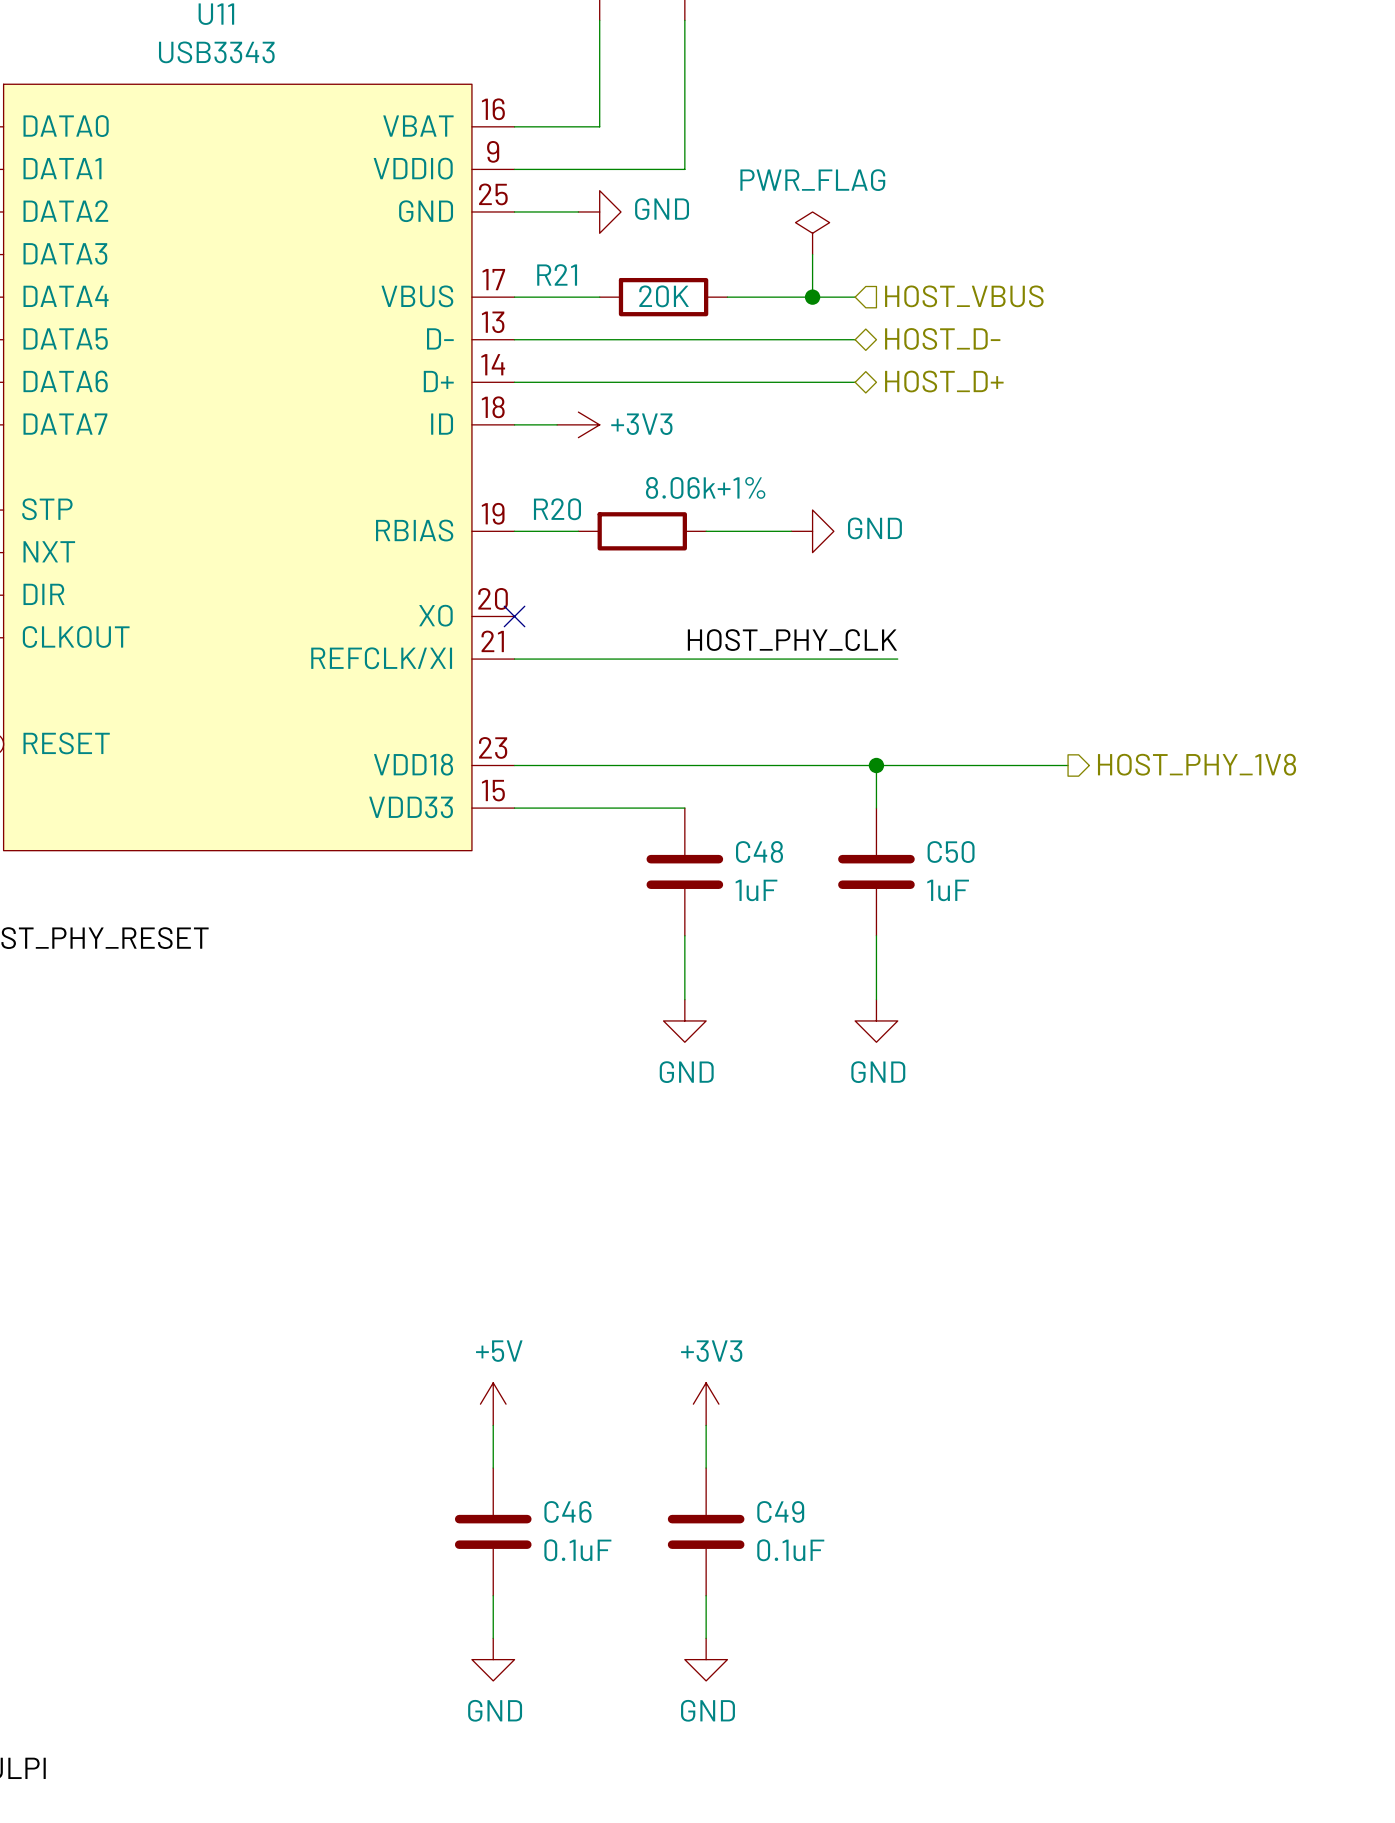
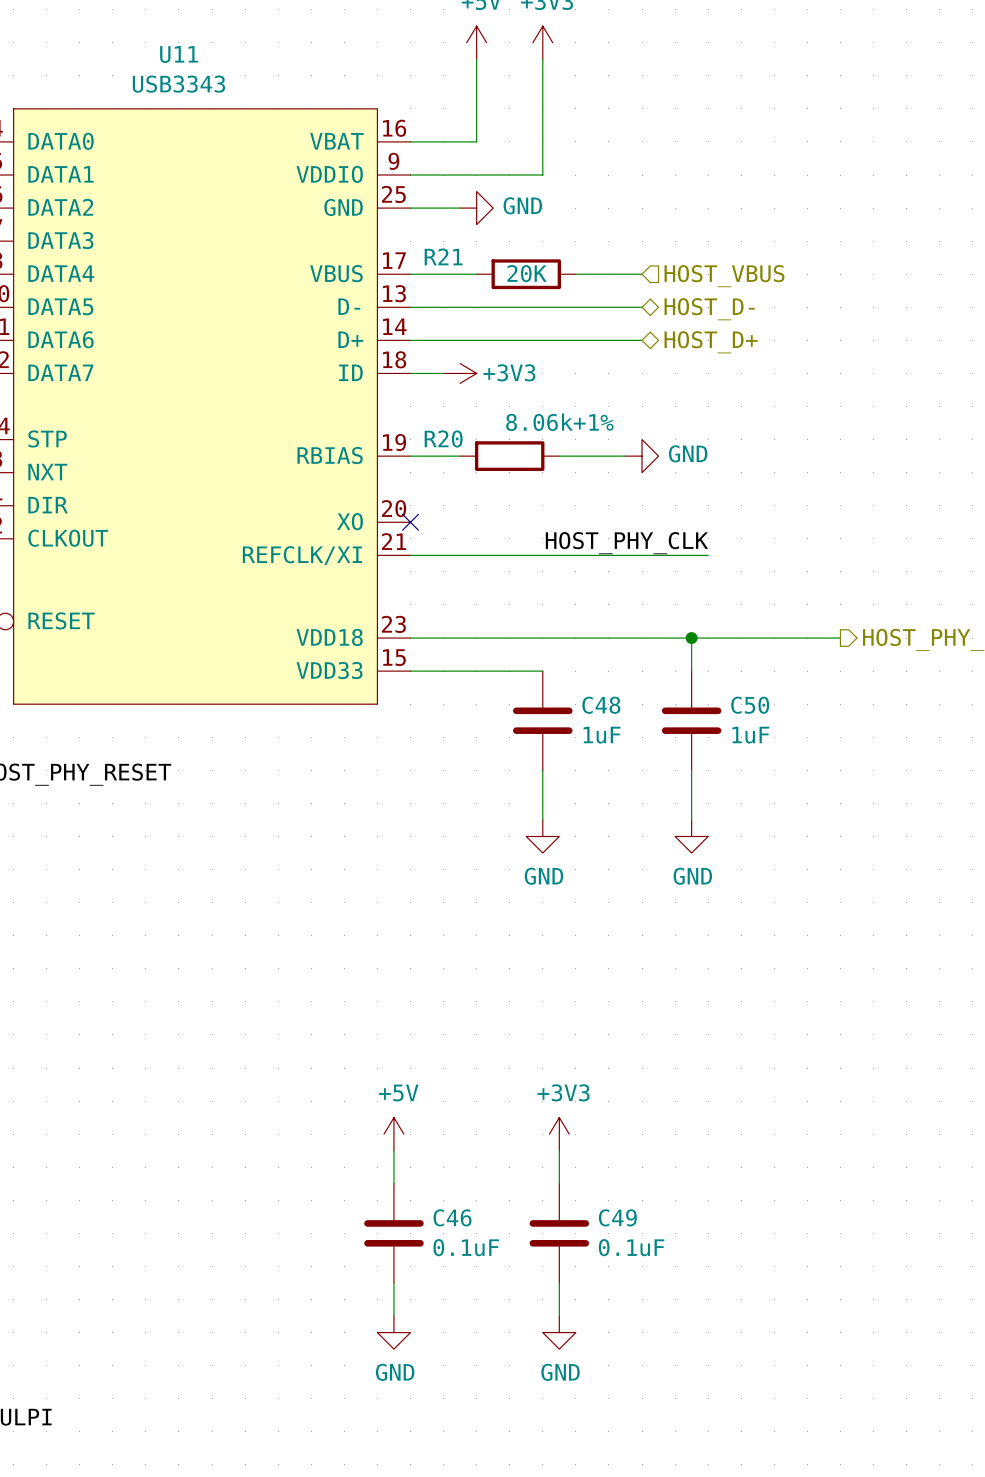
power symbol: PWR_FLAG (812, 233) -> none
wire: (812, 254) (812, 297) (855, 297) -> none
hierarchical label position: HOST_VBUS (964, 296) -> HOST_VBUS (724, 276)
junction: (812, 297) -> none
hierarchical label position: HOST_D- (942, 338) -> HOST_D- (709, 309)
wire: (812, 339) (855, 339) -> none
hierarchical label position: HOST_D+ (944, 381) -> HOST_D+ (711, 342)
wire: (812, 382) (855, 382) -> none

